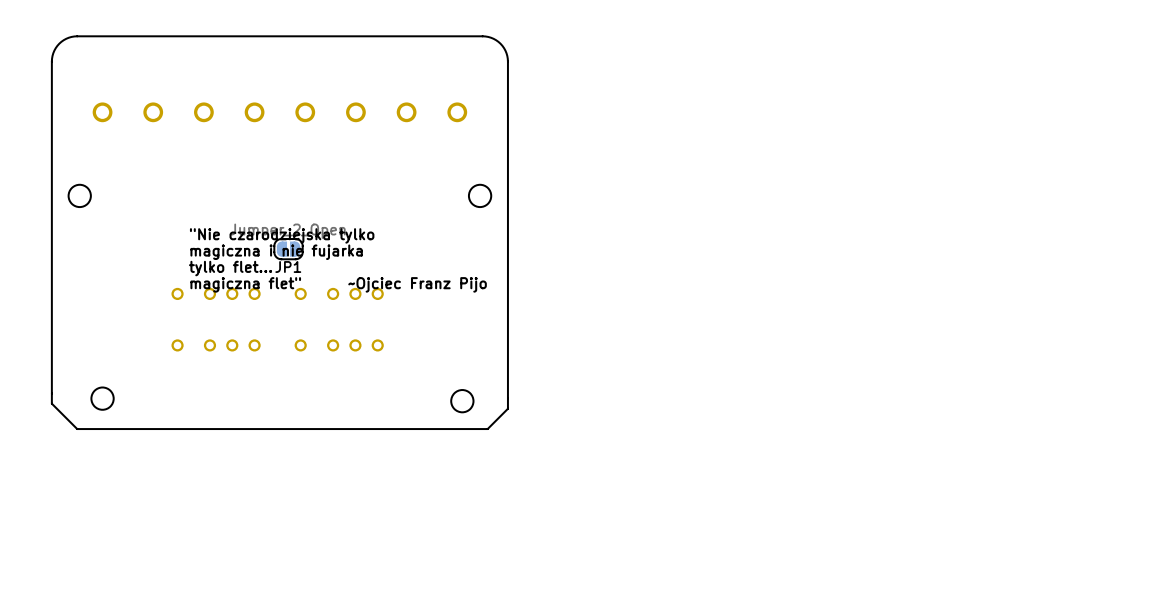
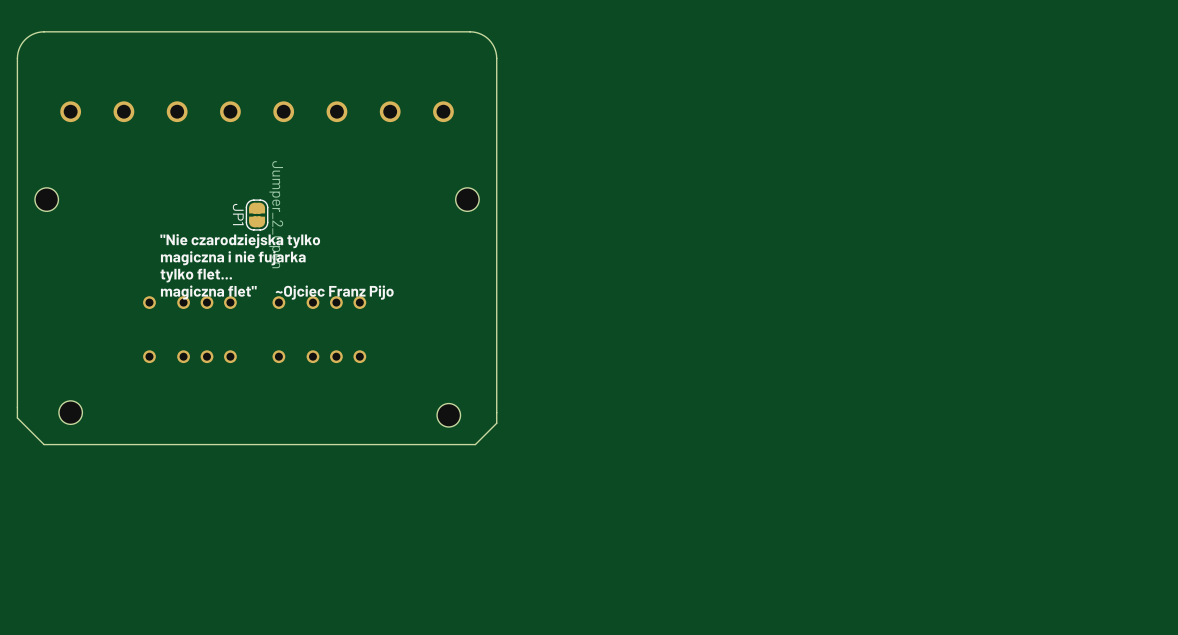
JP1 rotation: 0° (288, 249) -> 90° clockwise (257, 215)
JP1 position: (288, 249) -> (257, 215)

